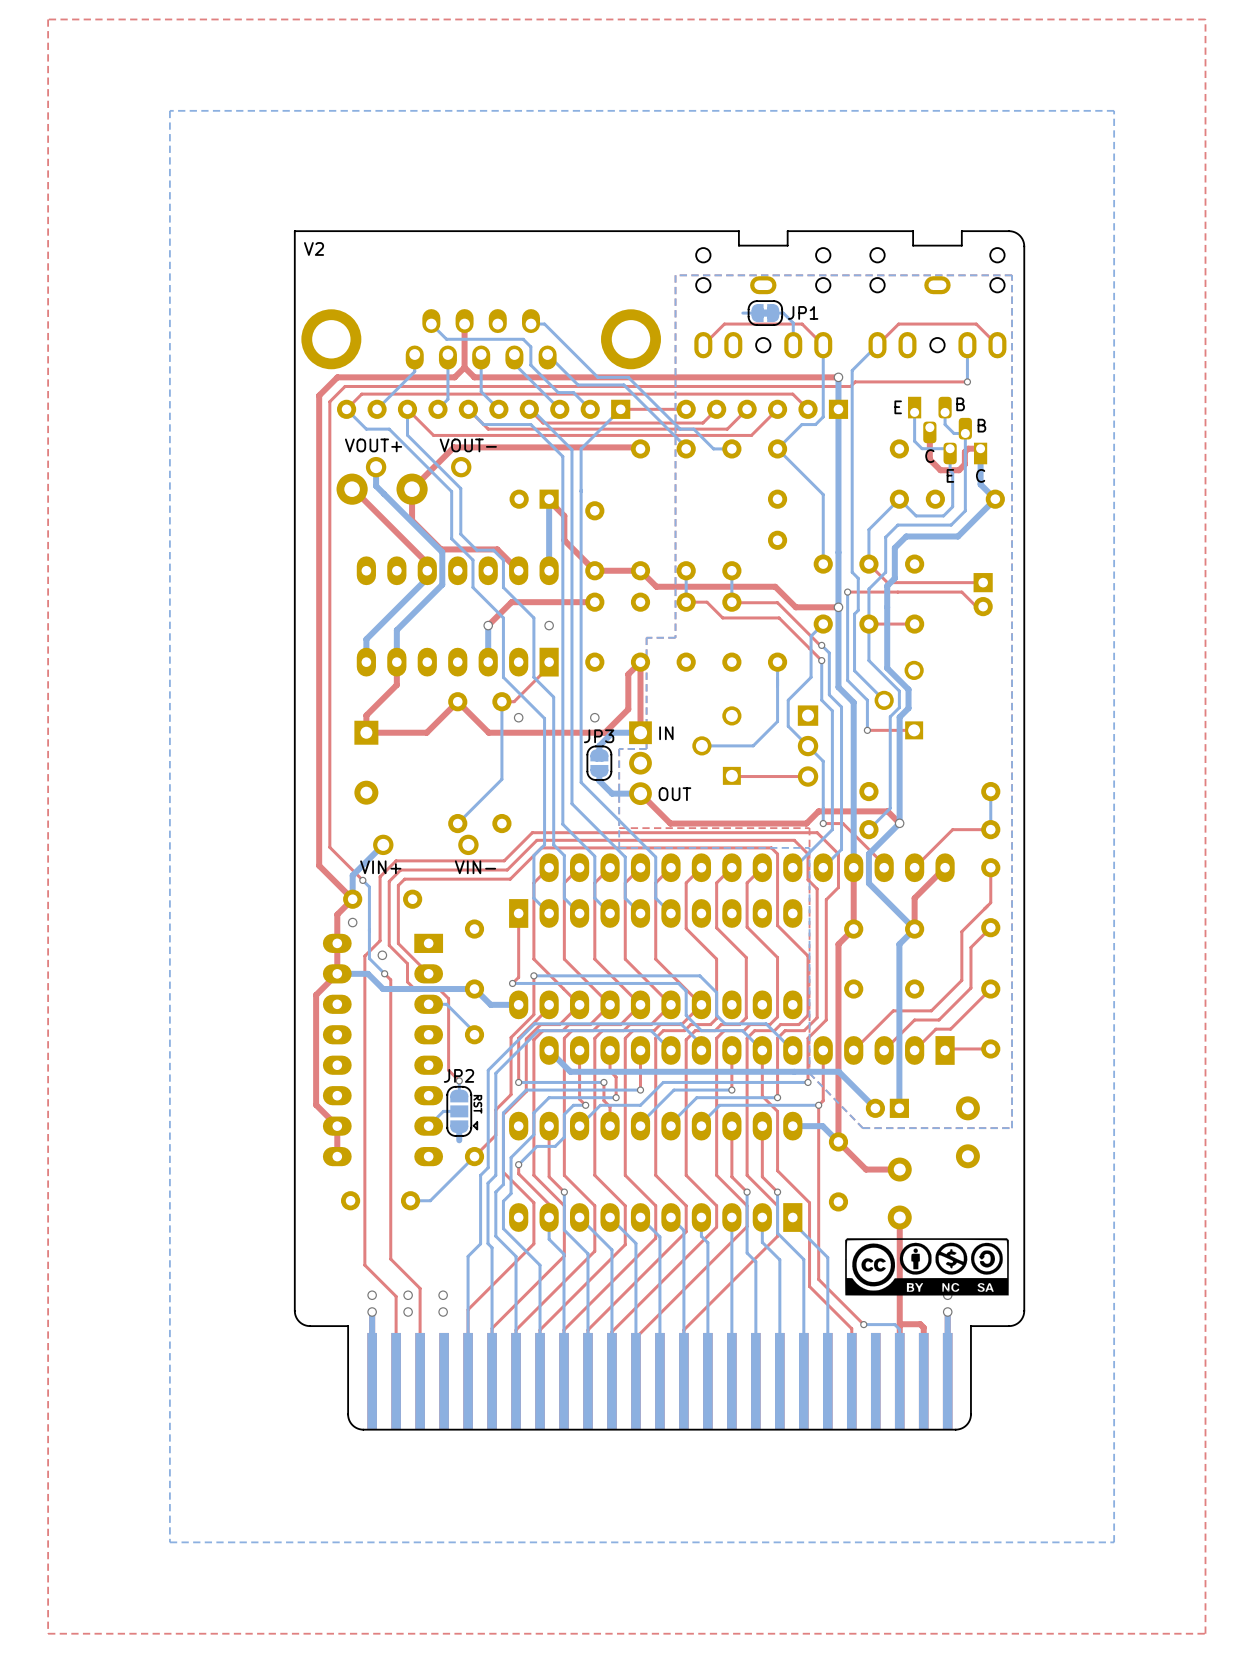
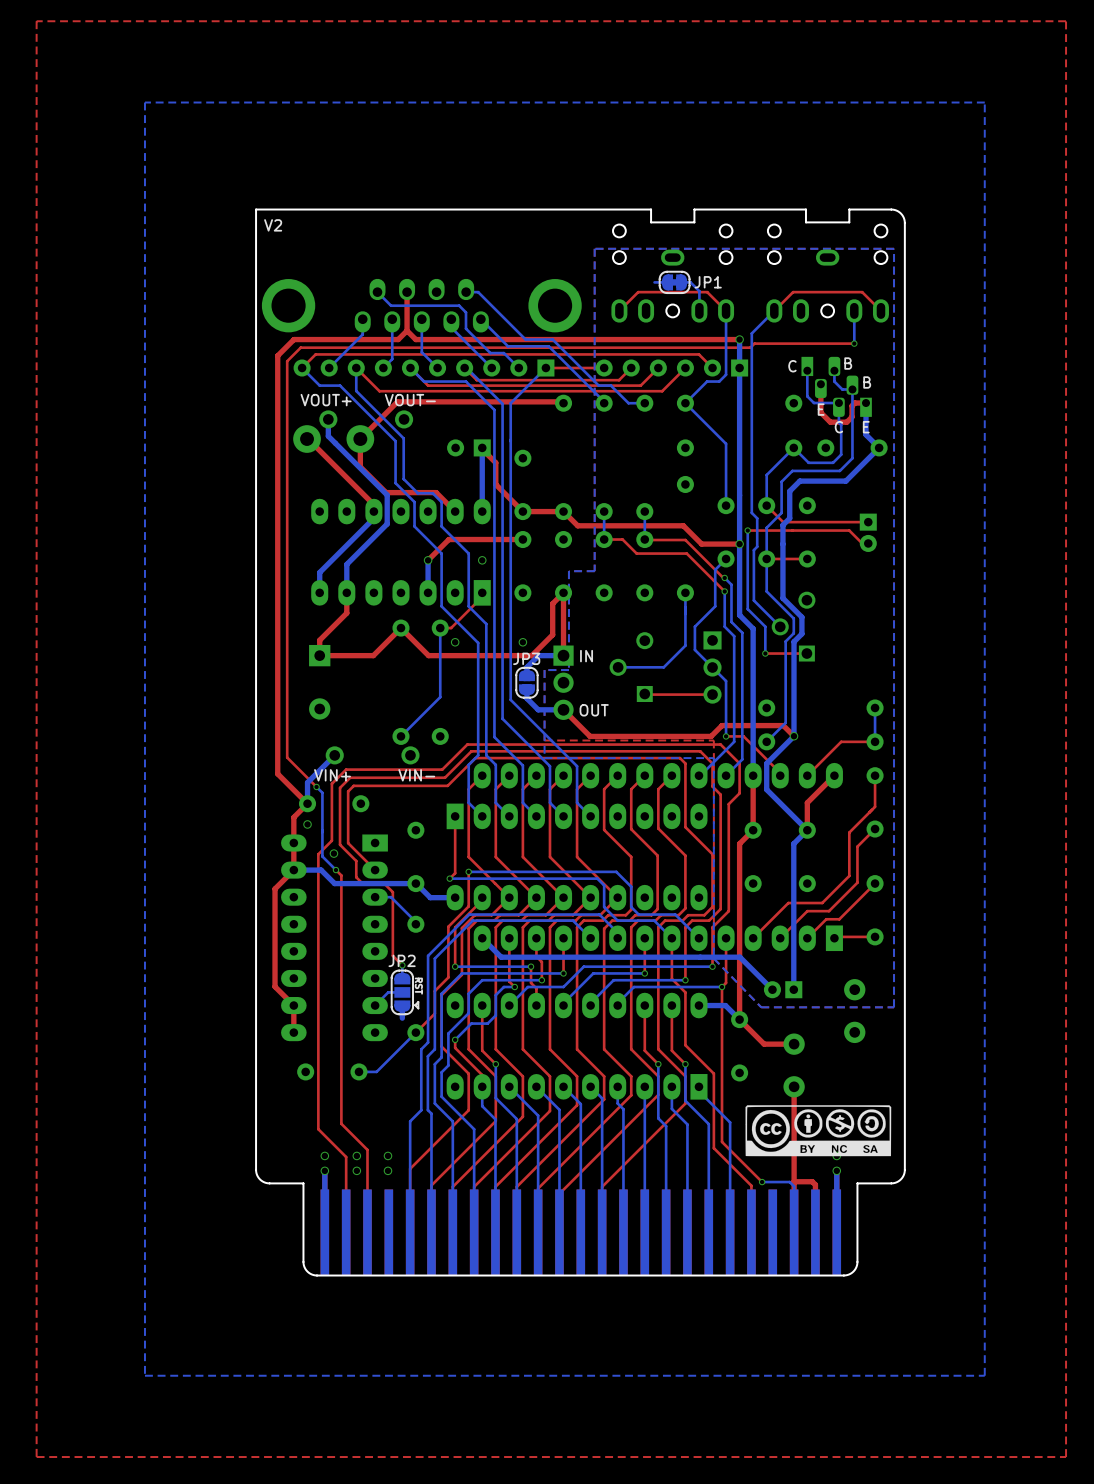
text: E (898, 407) -> C (792, 366)
text: C (929, 456) -> E (821, 409)
text: E (950, 475) -> C (838, 427)
text: C (980, 475) -> E (866, 427)

